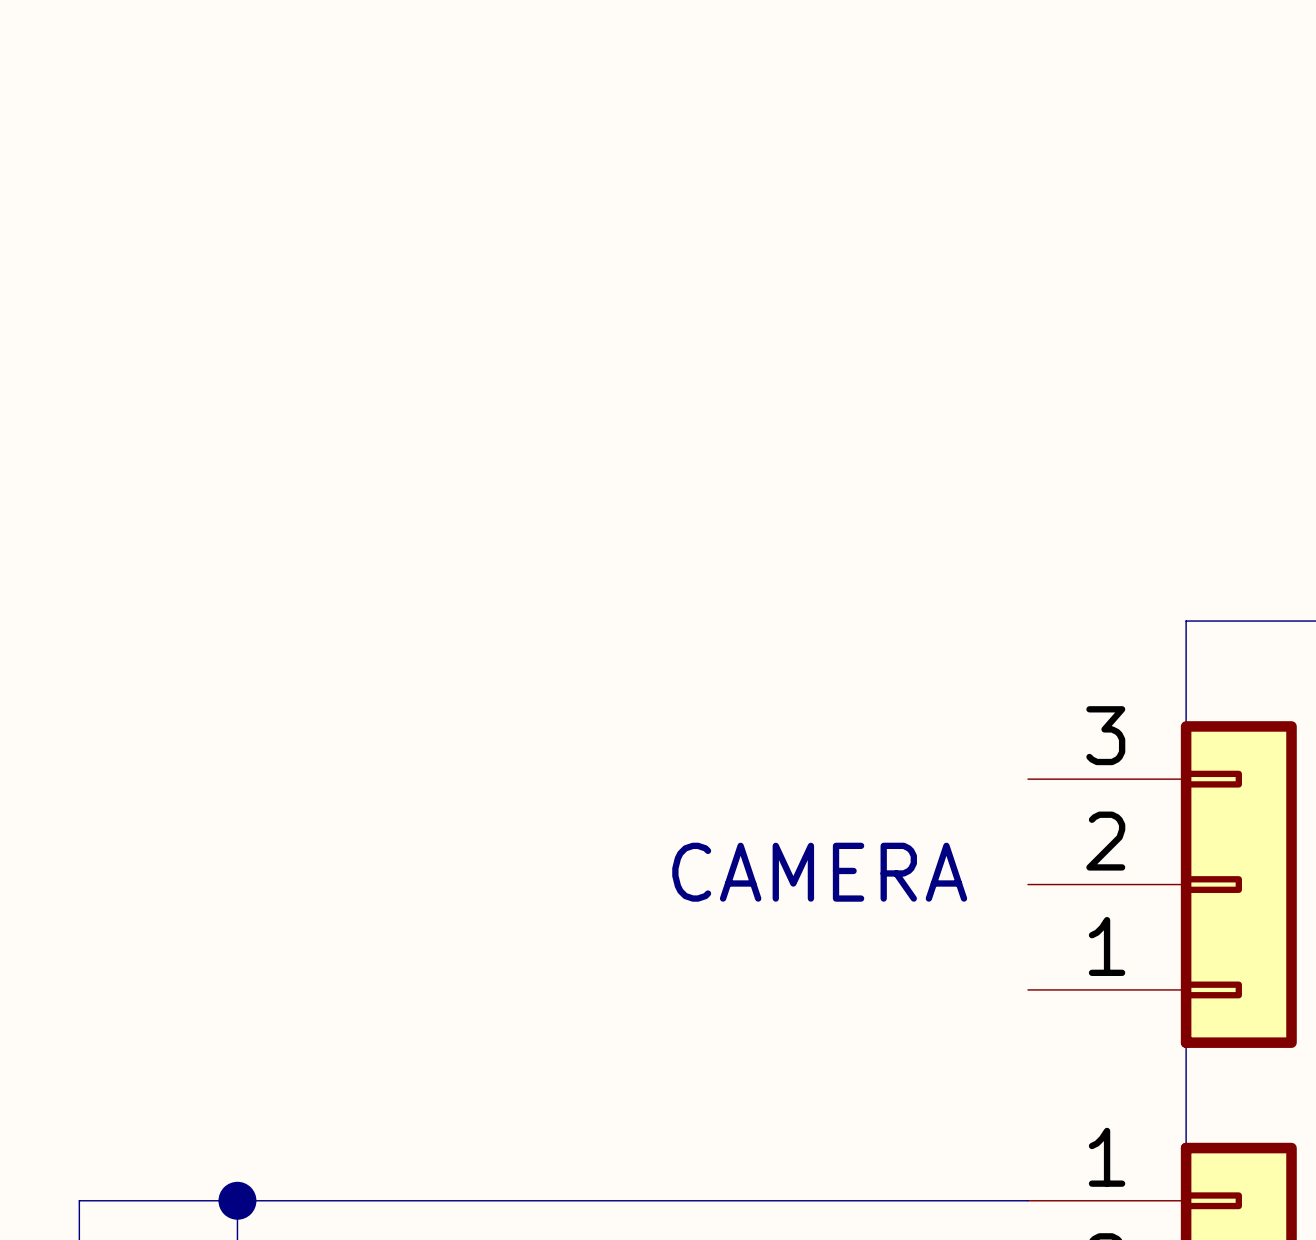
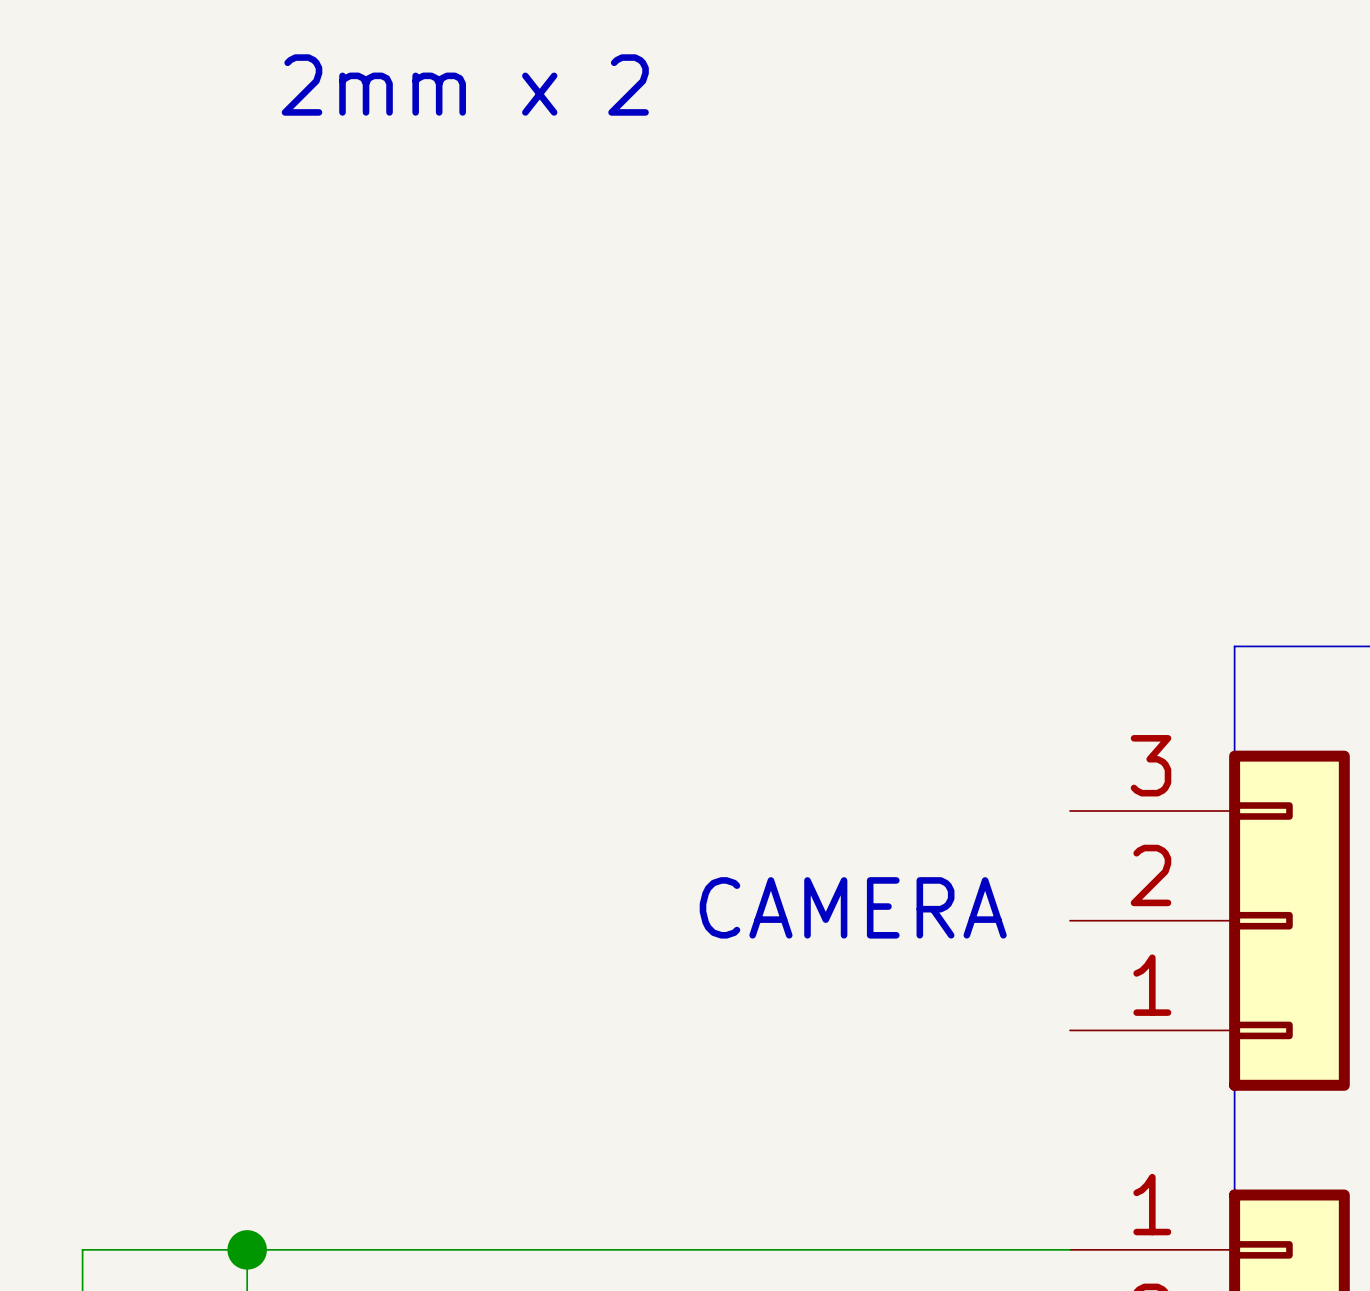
text: none -> 2mm x 2 (465, 84)

